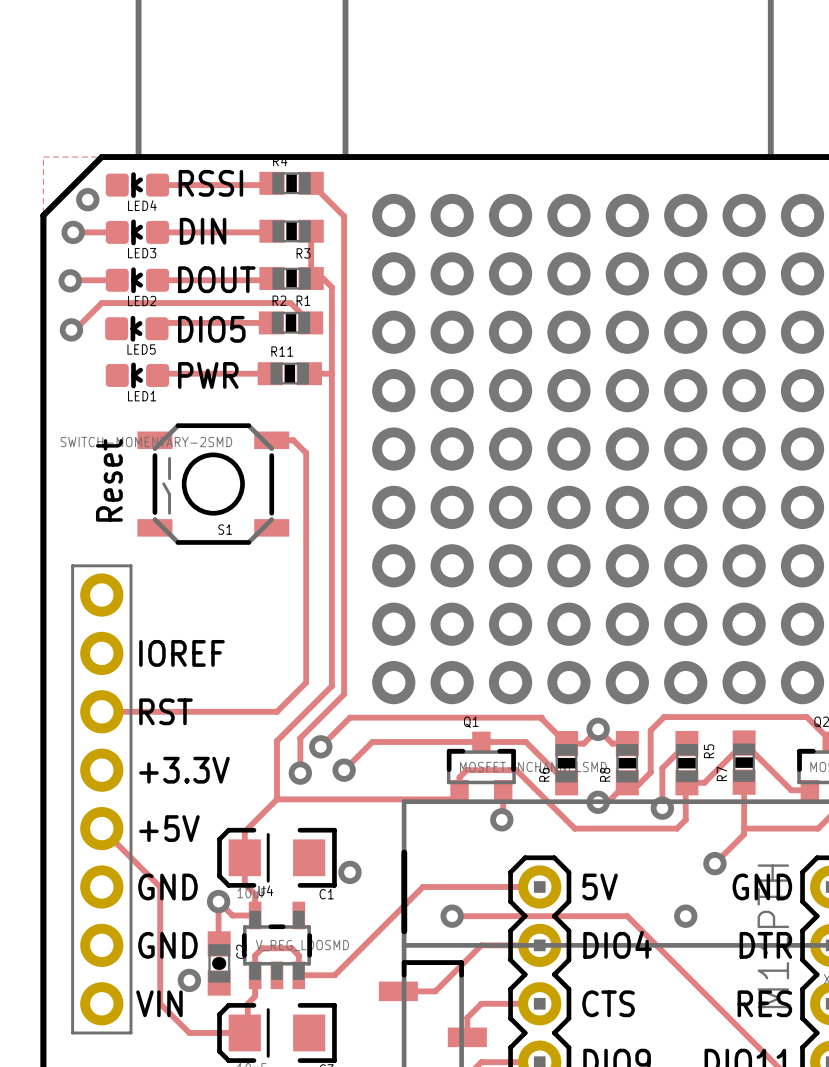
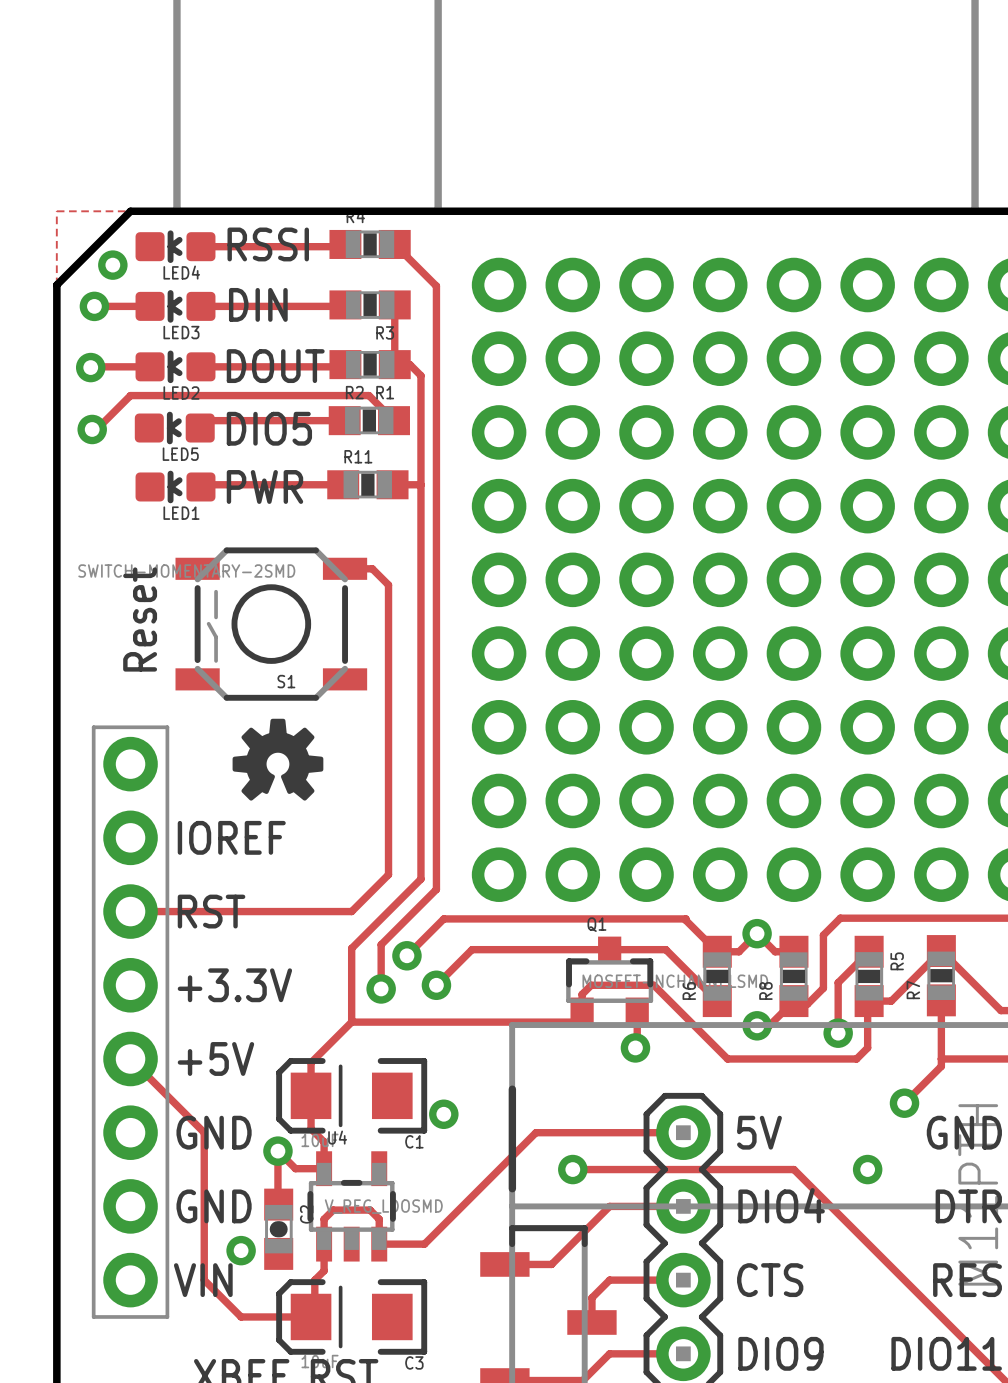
drawing: none -> [232, 718, 324, 801]

